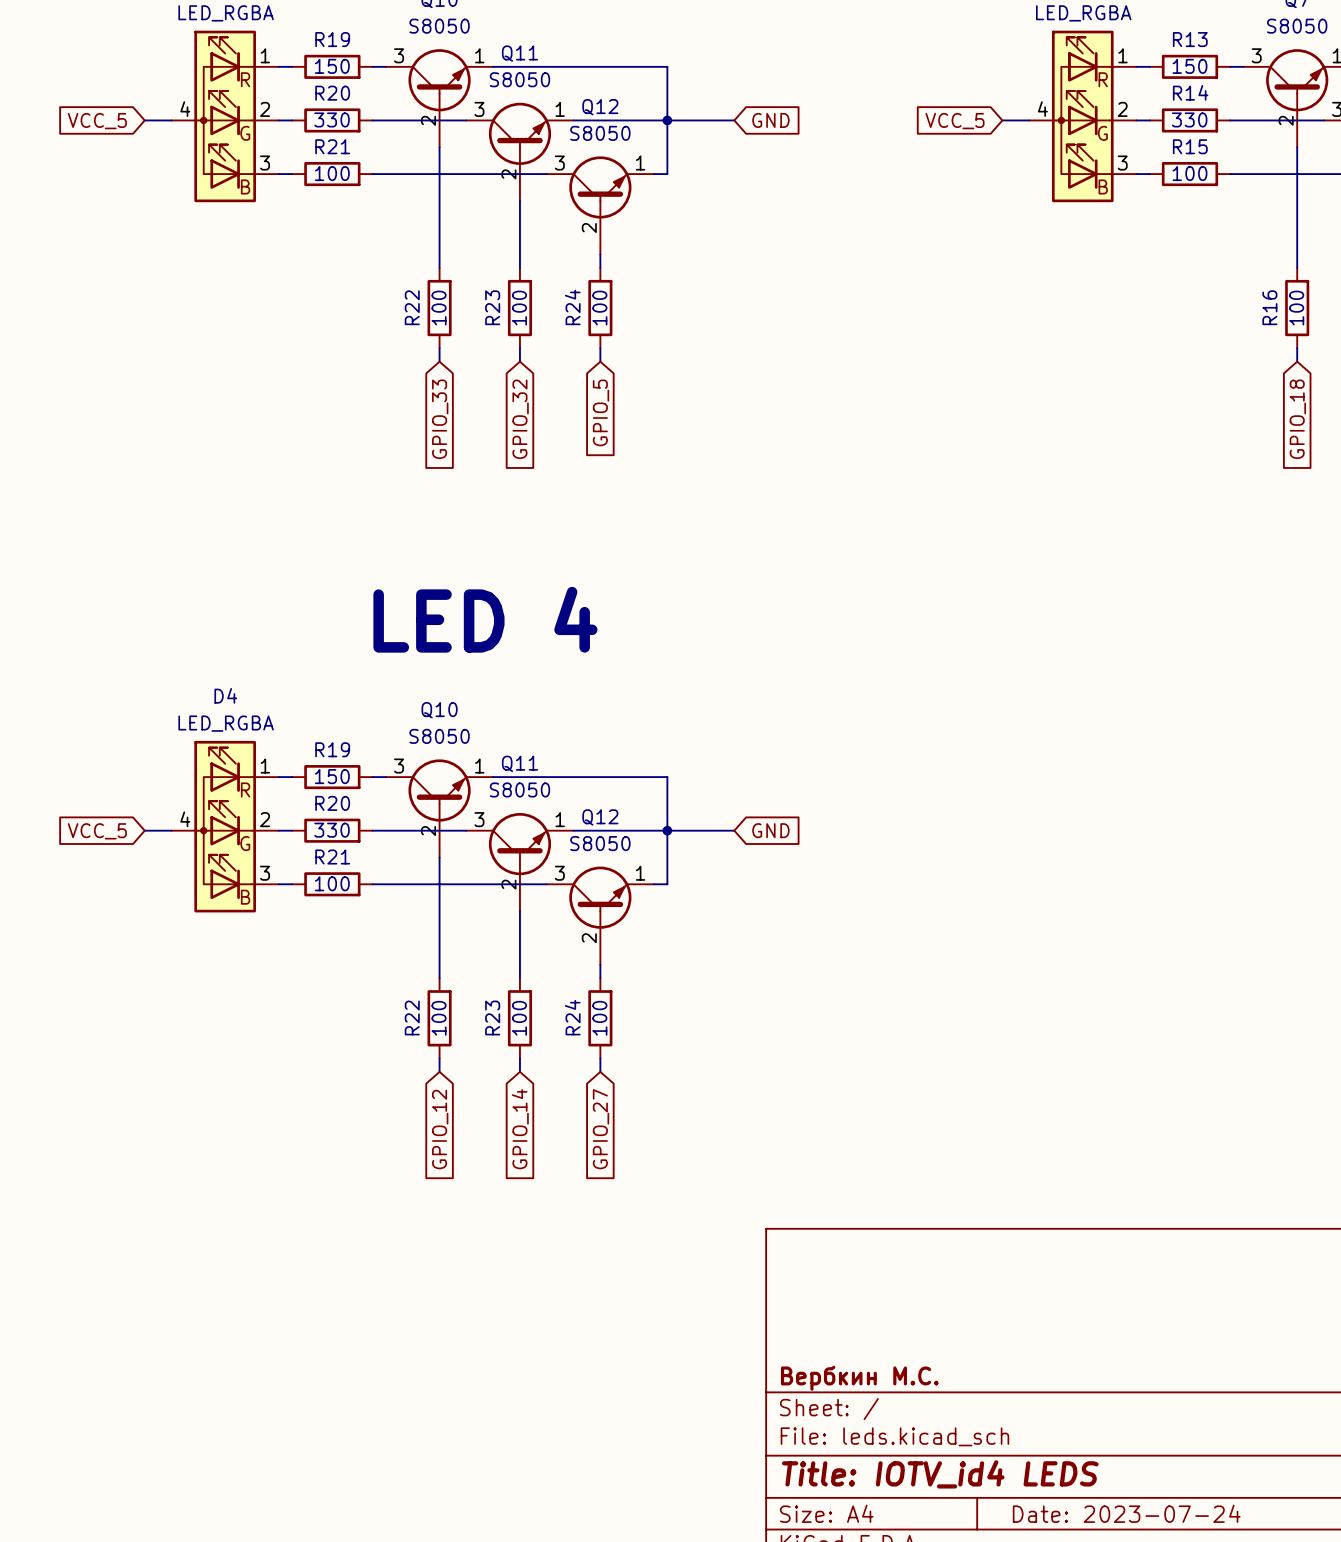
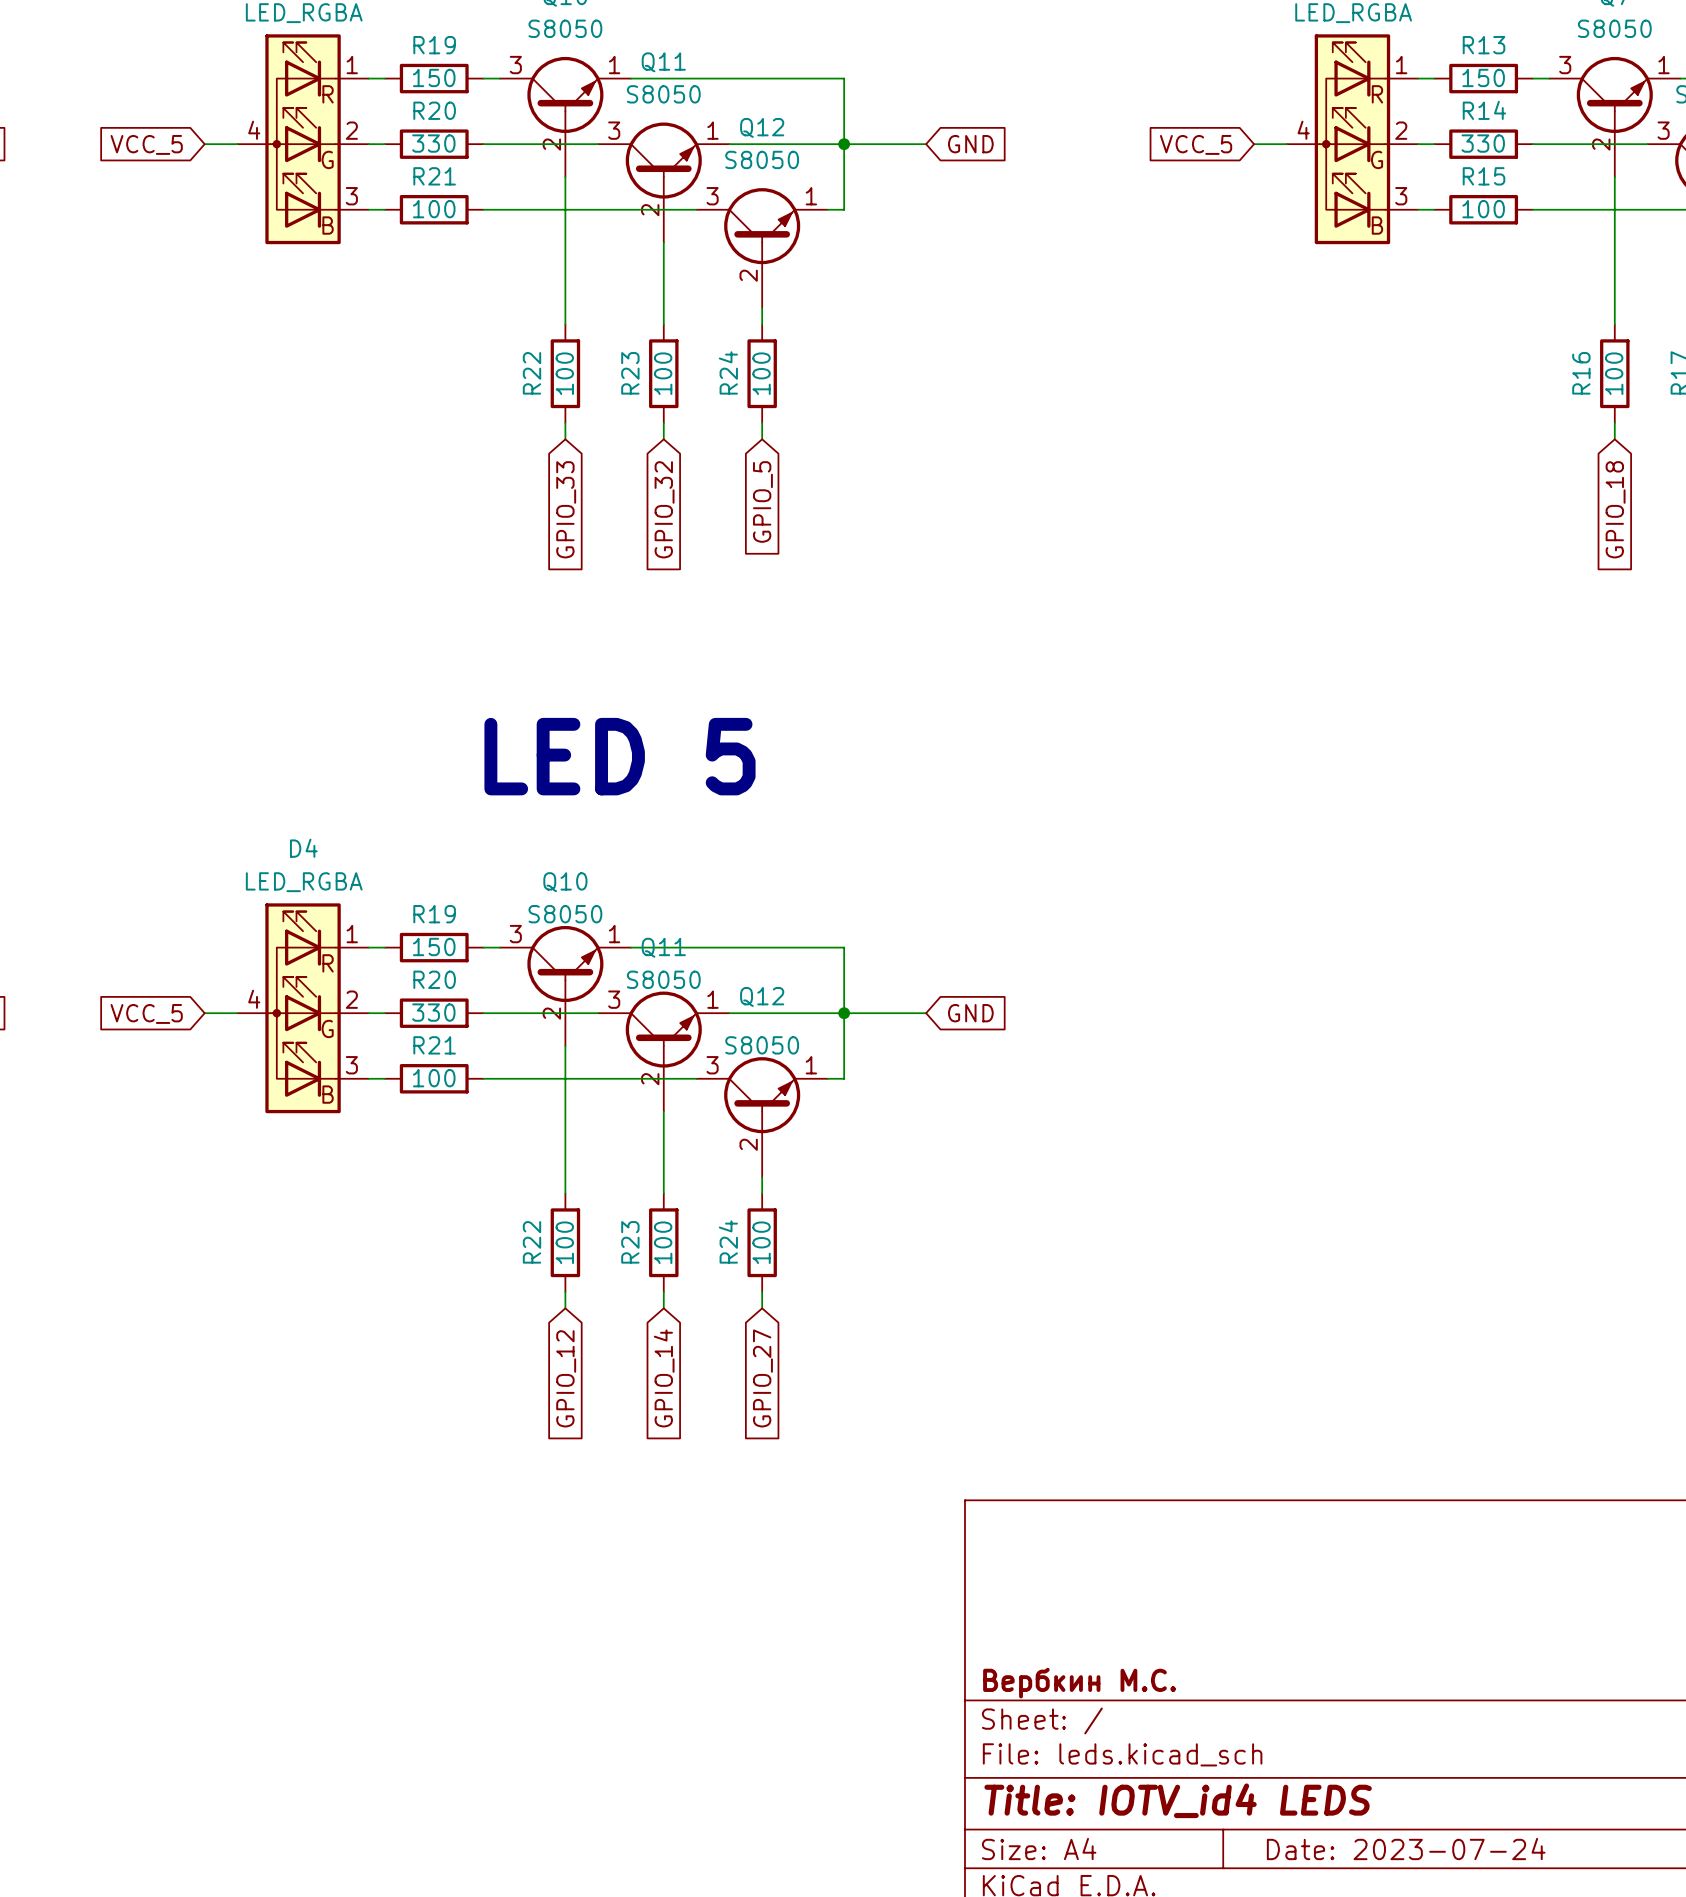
text: LED 4 (485, 619) -> LED 5 (619, 756)
Q10 name position: Q10 (439, 710) -> Q10 (565, 882)
Q10 value position: S8050 (439, 736) -> S8050 (565, 914)
Q11 name position: Q11 (519, 763) -> Q11 (663, 947)
Q11 value position: S8050 (519, 789) -> S8050 (663, 979)
Q12 value position: S8050 (600, 843) -> S8050 (762, 1045)

